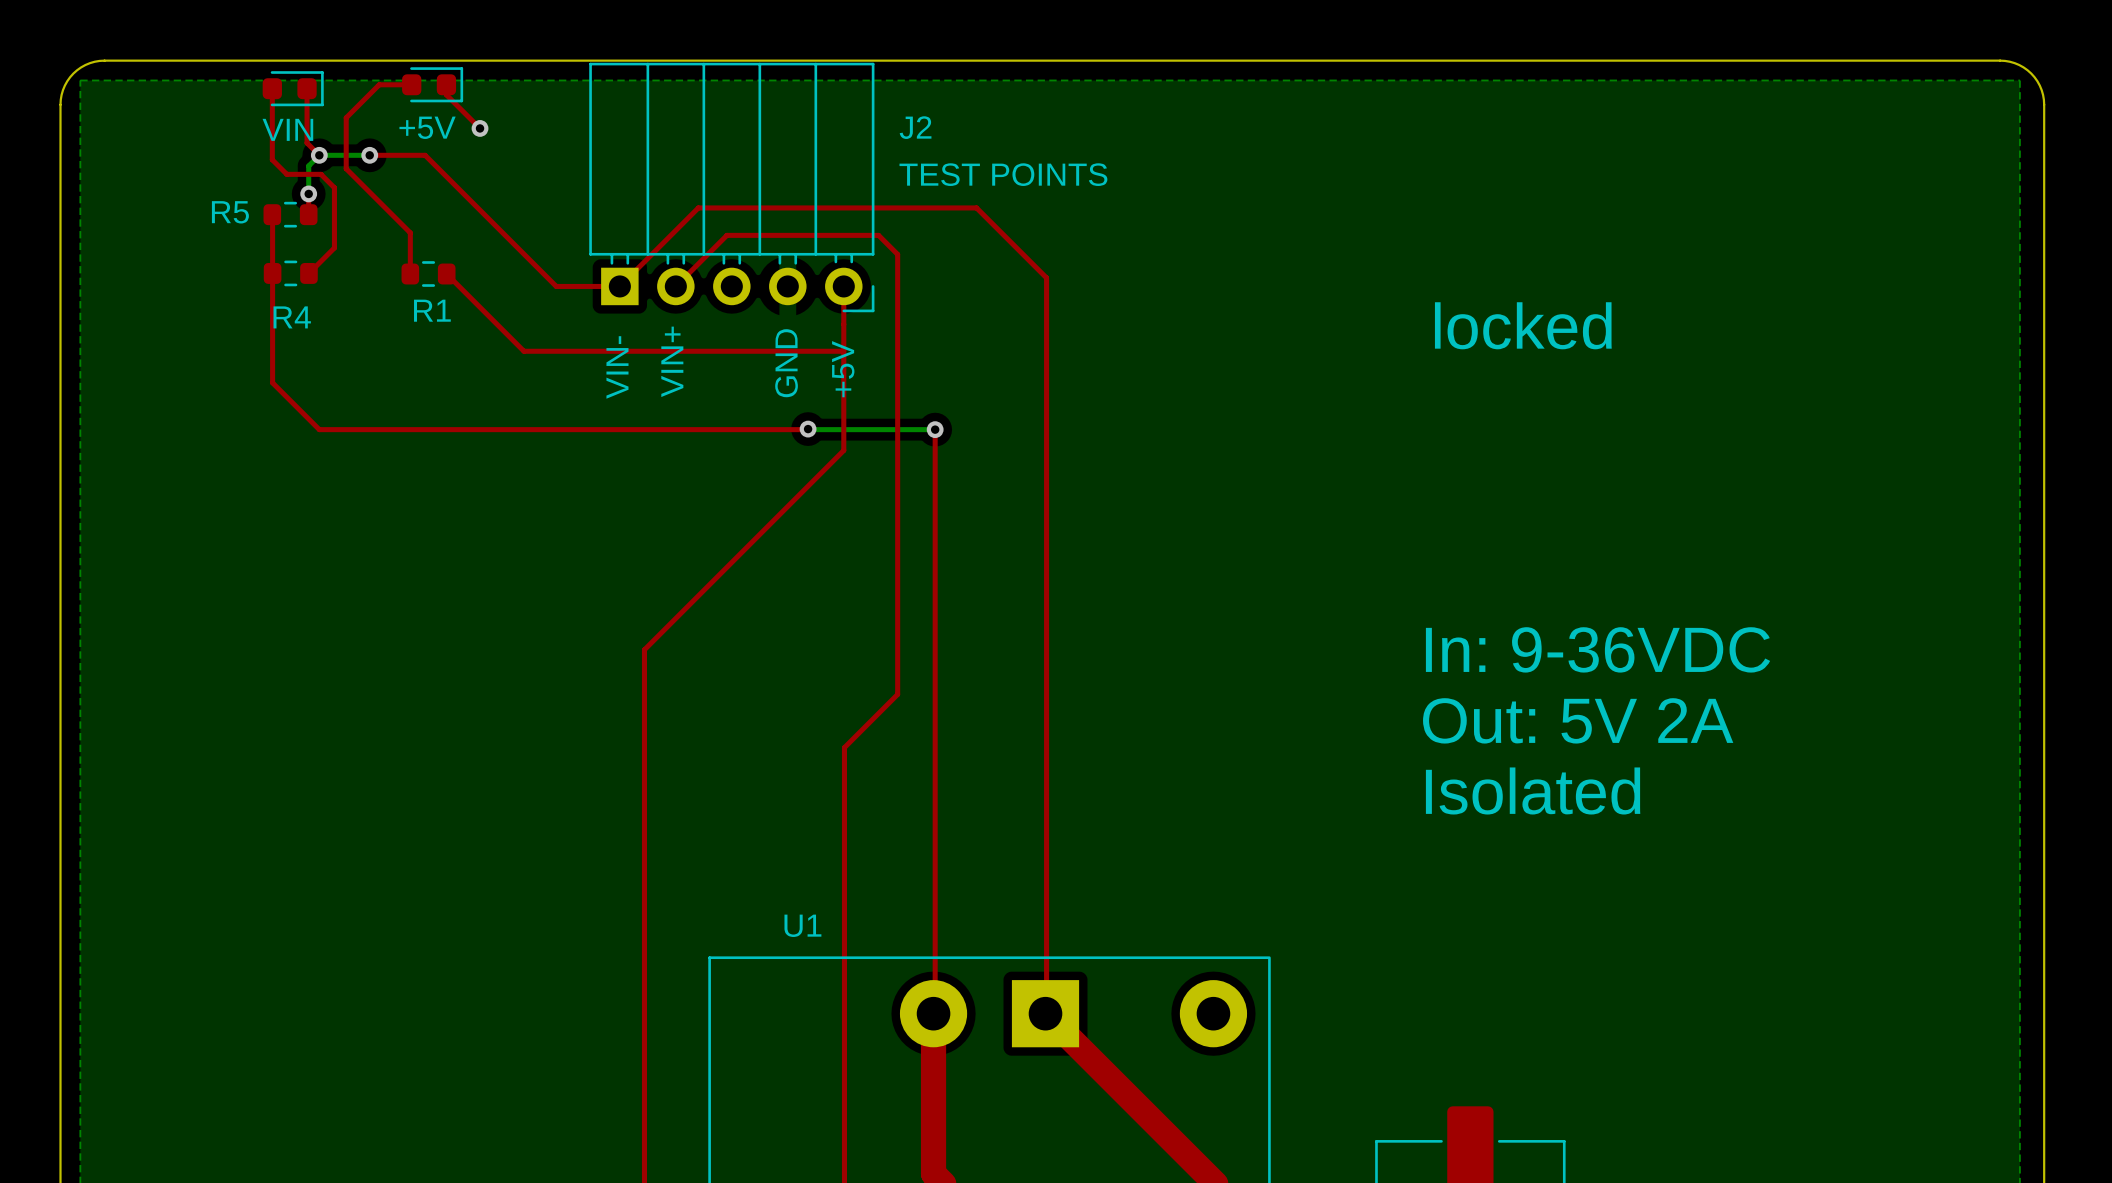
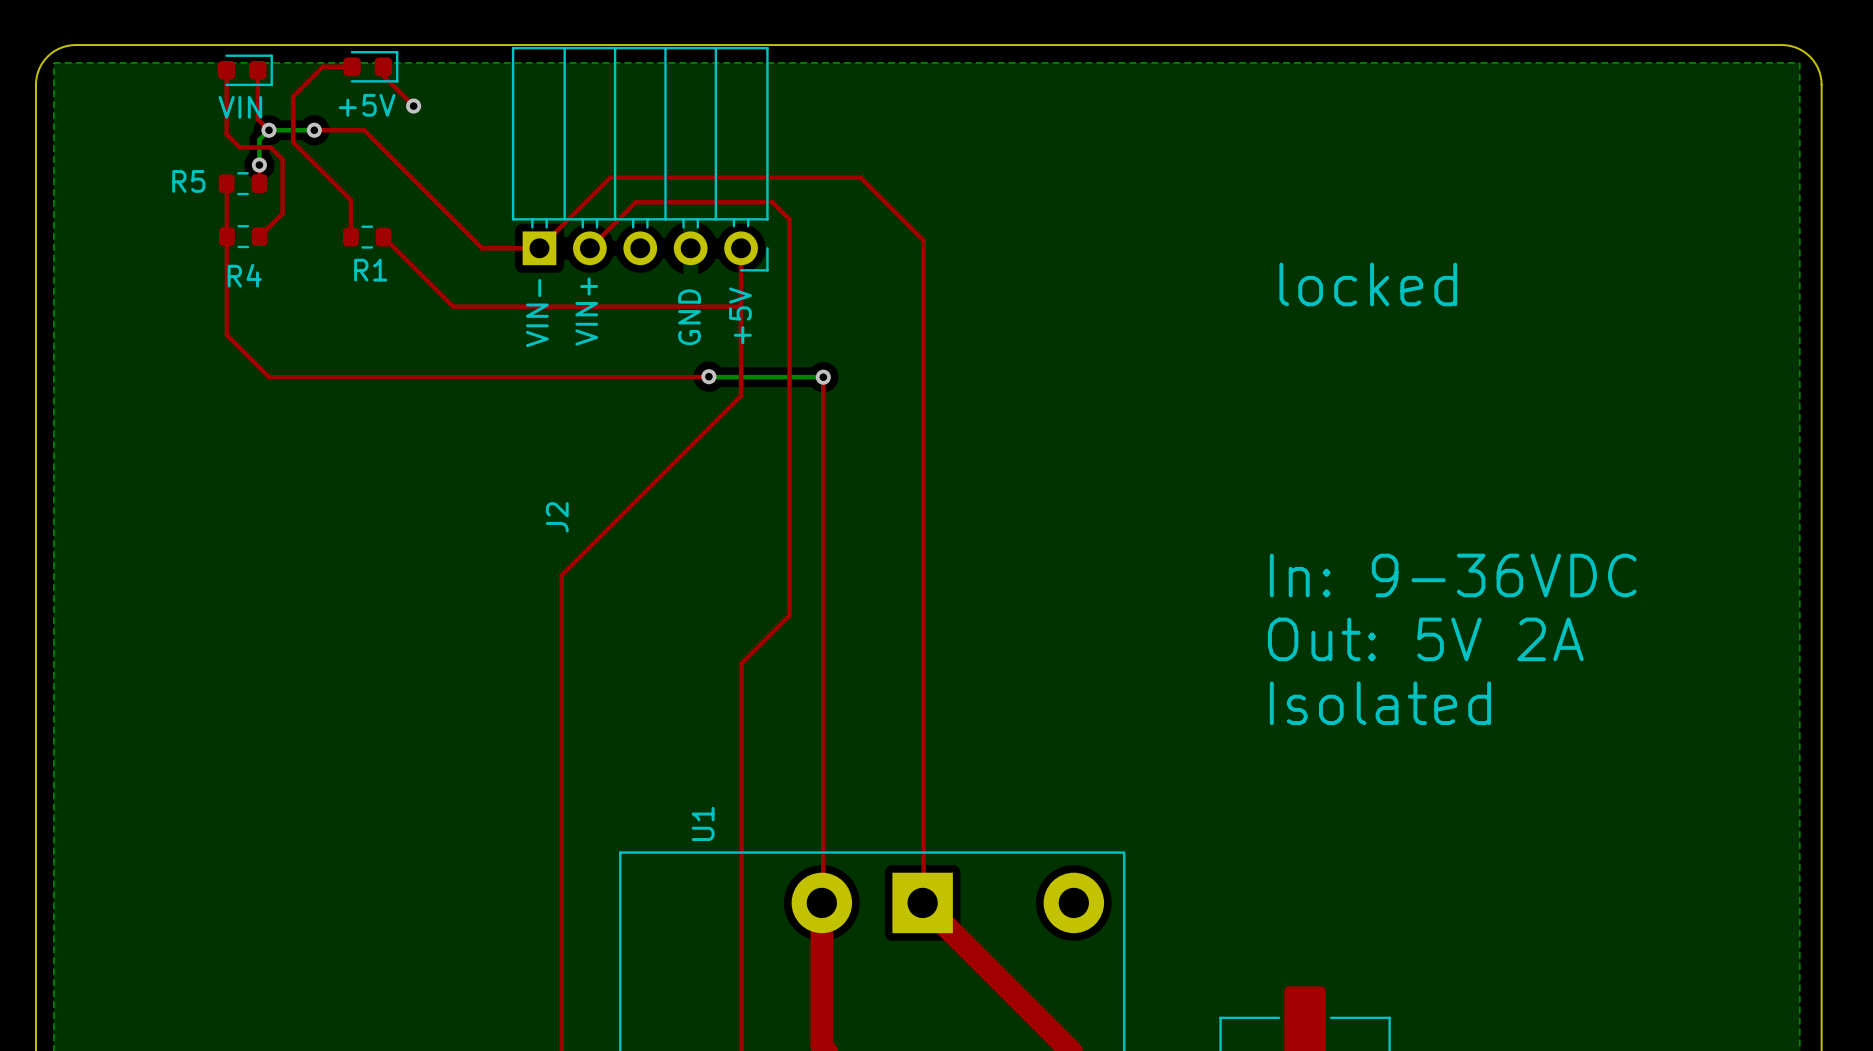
J2 name rotation: 0° (915, 127) -> 90° counterclockwise (557, 517)
J2 name position: J2 (915, 127) -> J2 (557, 517)
text: TEST POINTS (1003, 174) -> none
U1 name rotation: 0° (802, 925) -> 90° counterclockwise (703, 823)

